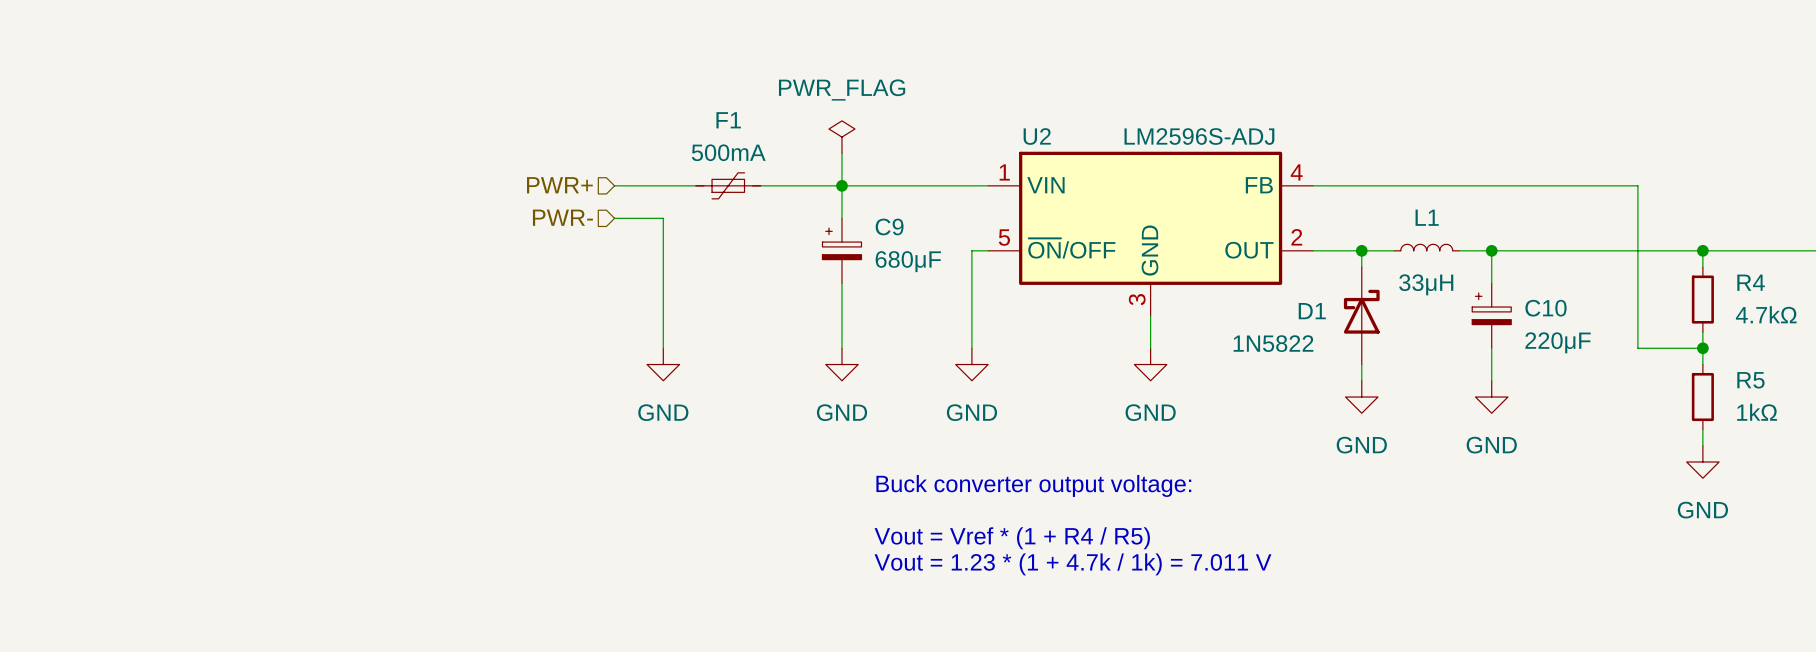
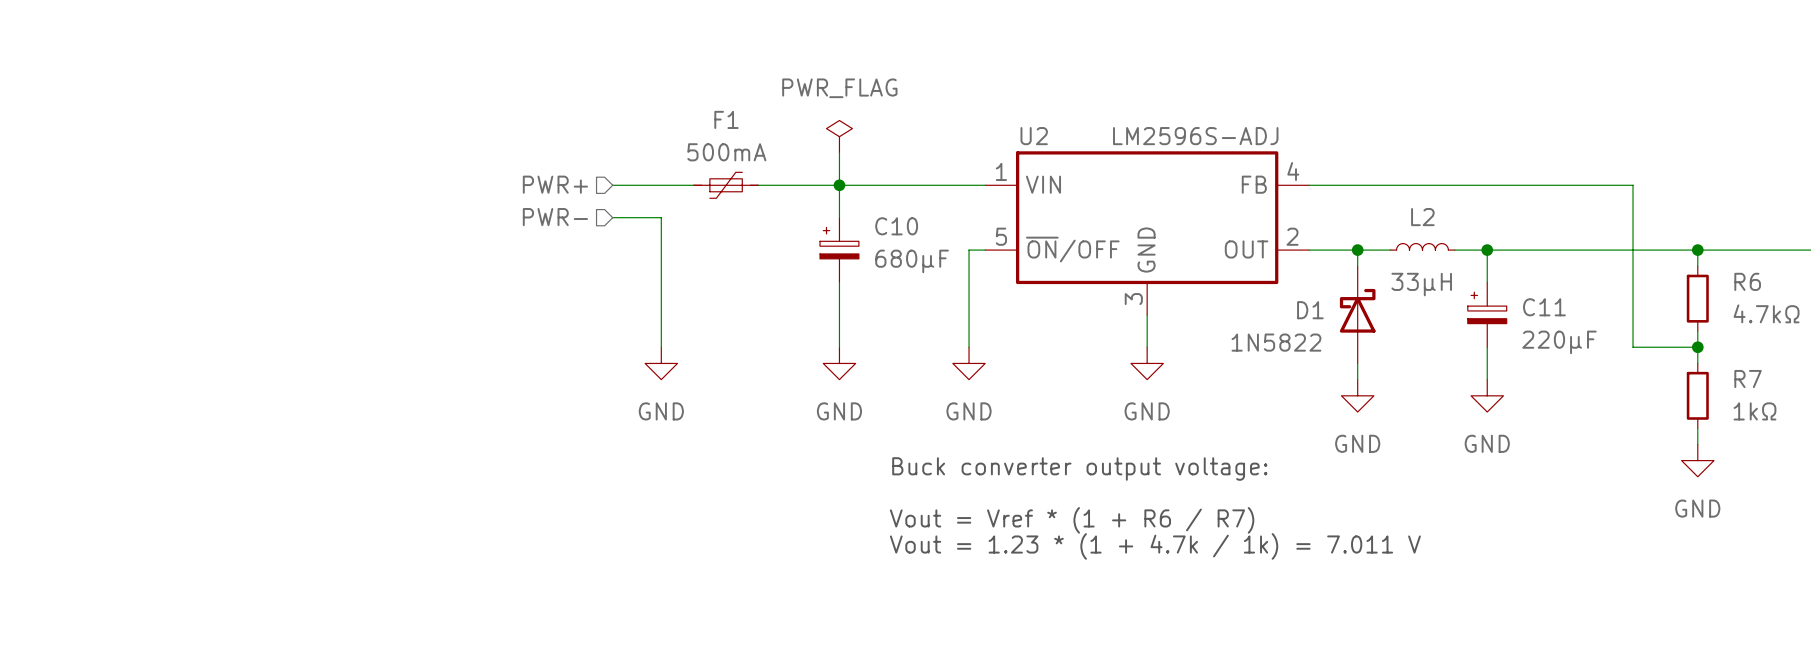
L1 name: L1 (1427, 217) -> L2 (1422, 217)
C9 name: C9 (889, 226) -> C10 (896, 226)
R4 name: R4 (1751, 282) -> R6 (1747, 281)
C10 name: C10 (1546, 308) -> C11 (1544, 307)
R5 name: R5 (1750, 380) -> R7 (1748, 379)
text position: Buck converter output voltage: (1033, 485) -> Buck converter output voltage: (1079, 468)
text: Vout = Vref * (1 + R4 / R5) (1012, 538) -> Vout = Vref * (1 + R6 / R7) (1072, 520)
text position: Vout = 1.23 * (1 + 4.7k / 1k) = 7.011 V (1072, 564) -> Vout = 1.23 * (1 + 4.7k / 1k) = 7.011 V (1155, 546)

